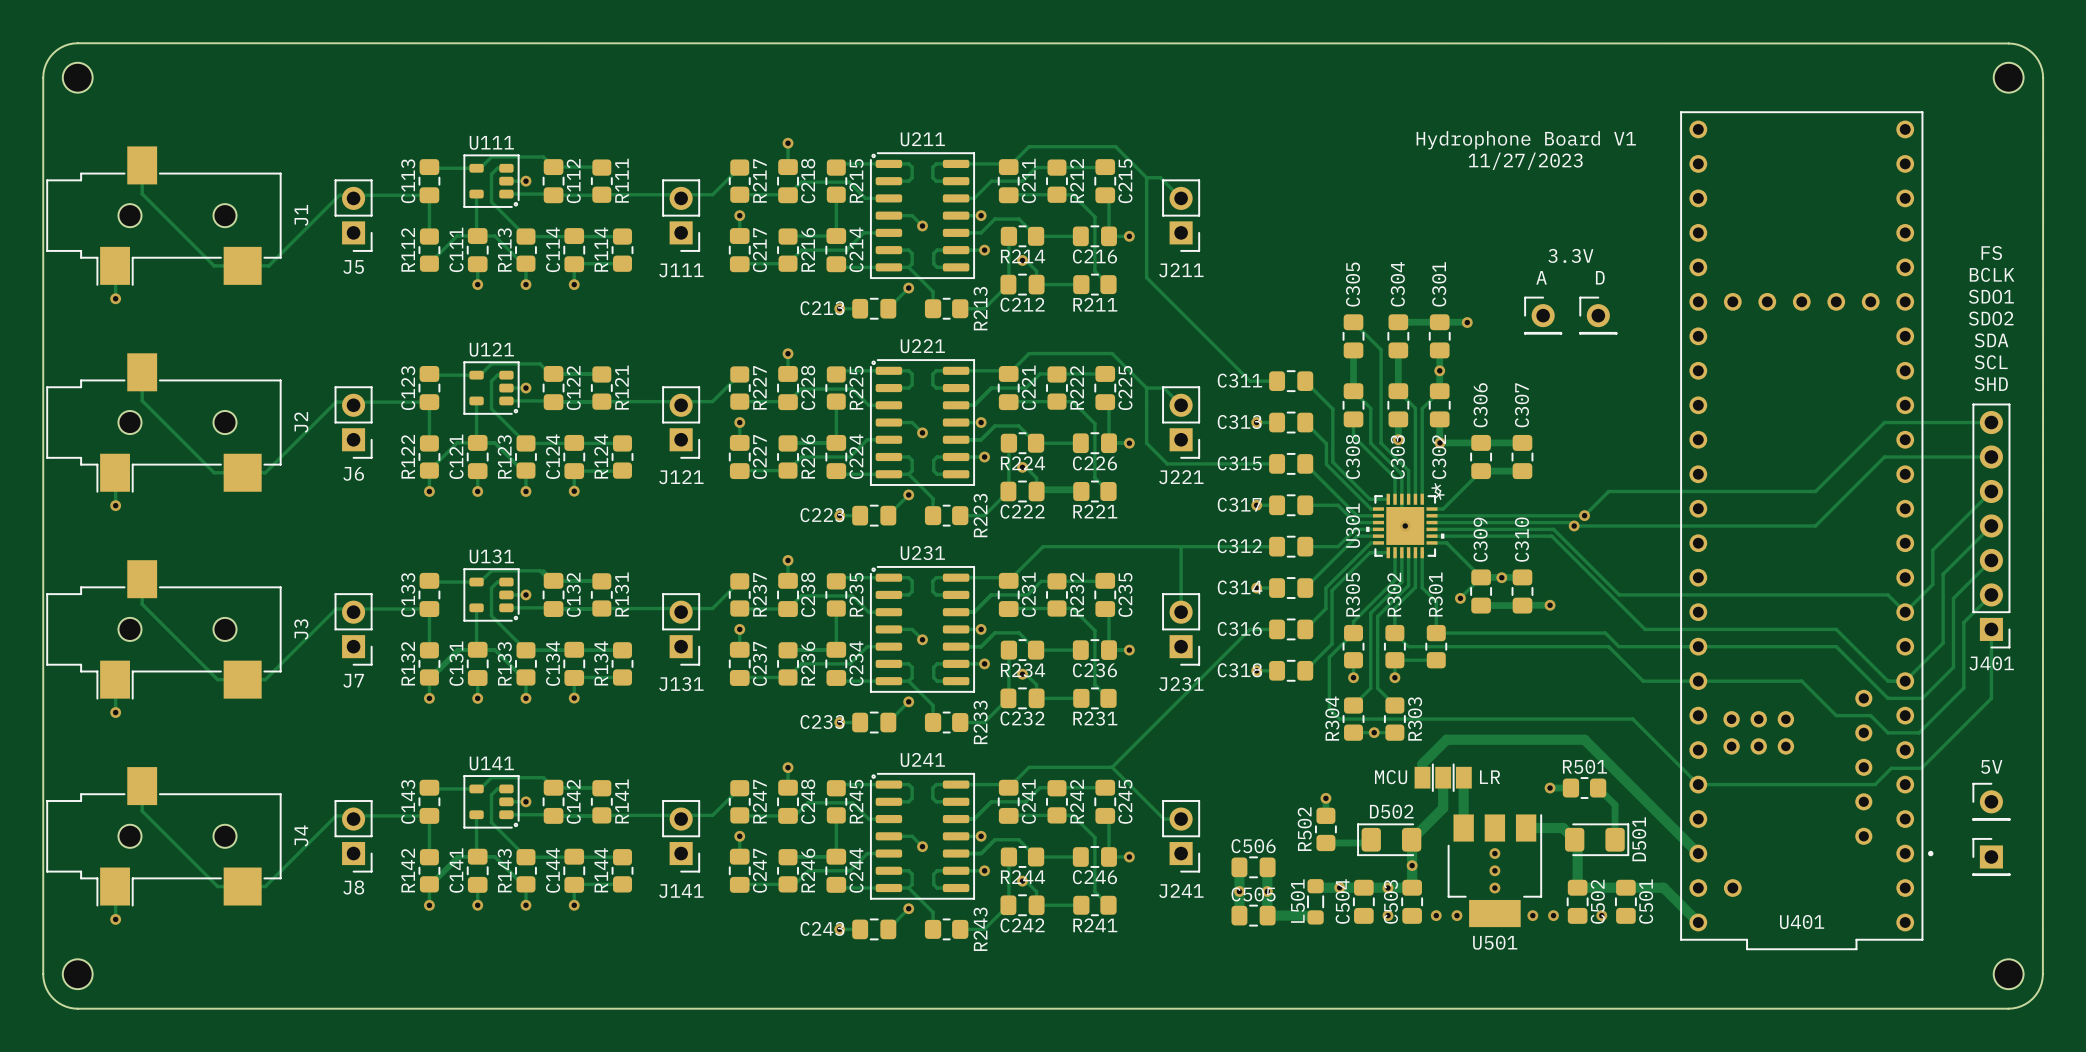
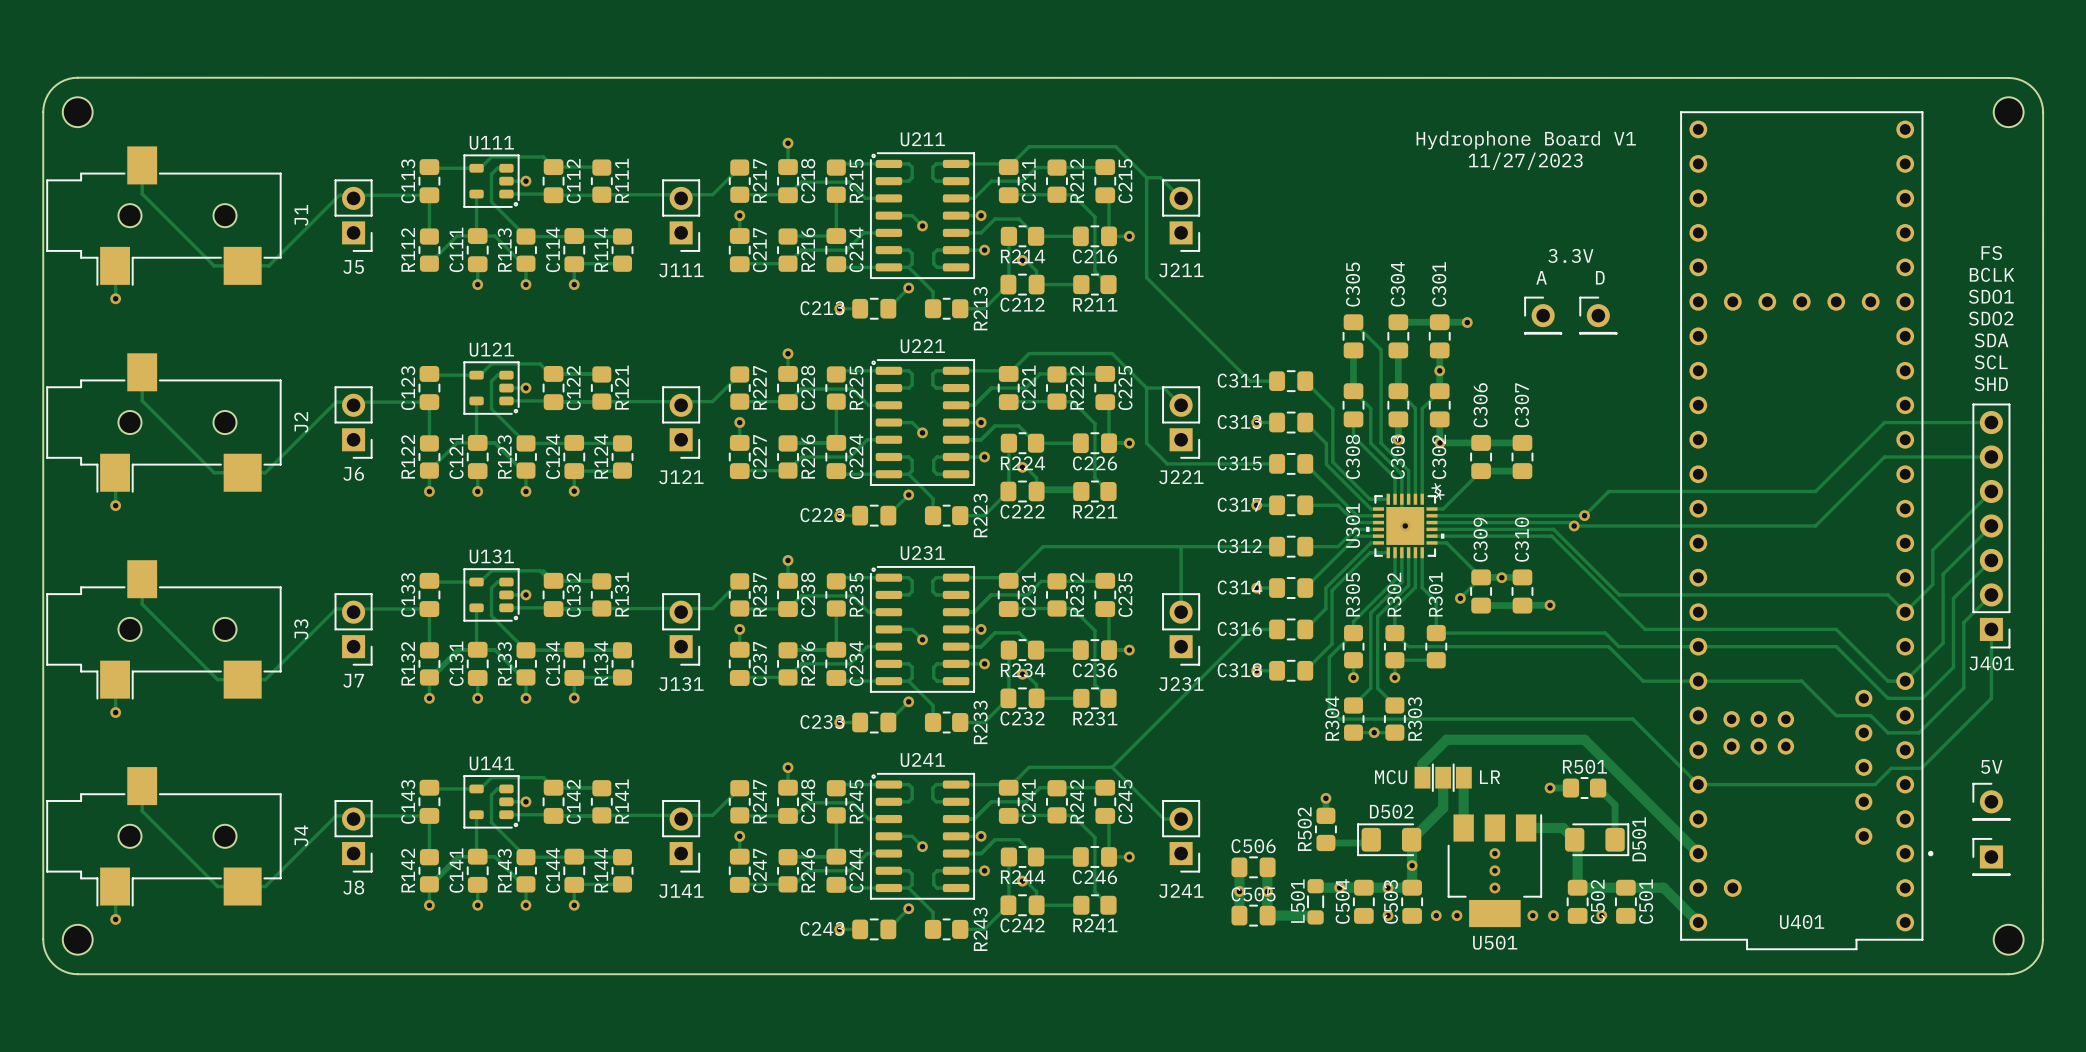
part position: (77, 77) -> (77, 112)
part position: (2008, 77) -> (2008, 112)
board edge: (43, 112) (43, 73) (47, 60) (60, 47) (77, 43) (2008, 43) (2025, 48) (2038, 60) (2042, 73) (2043, 112) -> (43, 112) (45, 99) (53, 87) (64, 80) (77, 77) (2008, 77) (2021, 80) (2033, 88) (2040, 99) (2043, 112)
board edge: (43, 939) (43, 977) (46, 988) (59, 1003) (77, 1008) (2008, 1008) (2025, 1004) (2038, 991) (2042, 978) (2042, 939) -> (43, 939) (46, 954) (53, 964) (62, 970) (77, 974) (2008, 974) (2021, 971) (2032, 964) (2040, 952) (2042, 939)
part position: (77, 974) -> (77, 939)
part position: (2008, 974) -> (2008, 939)

